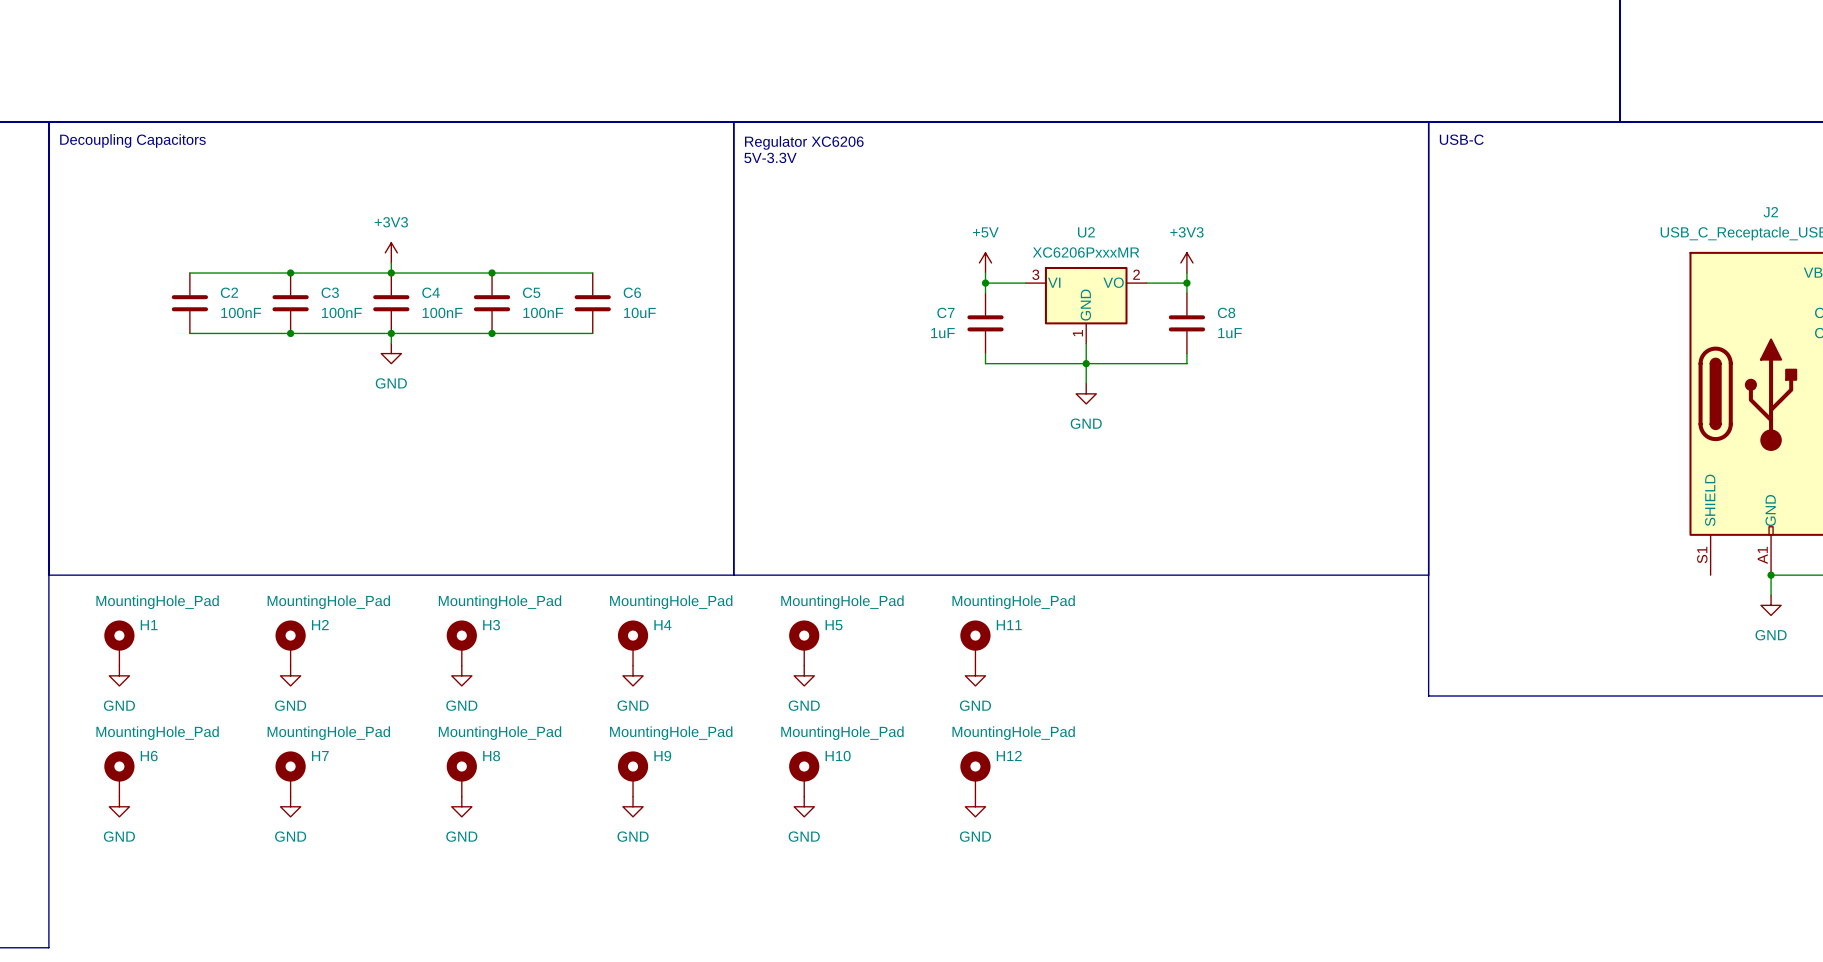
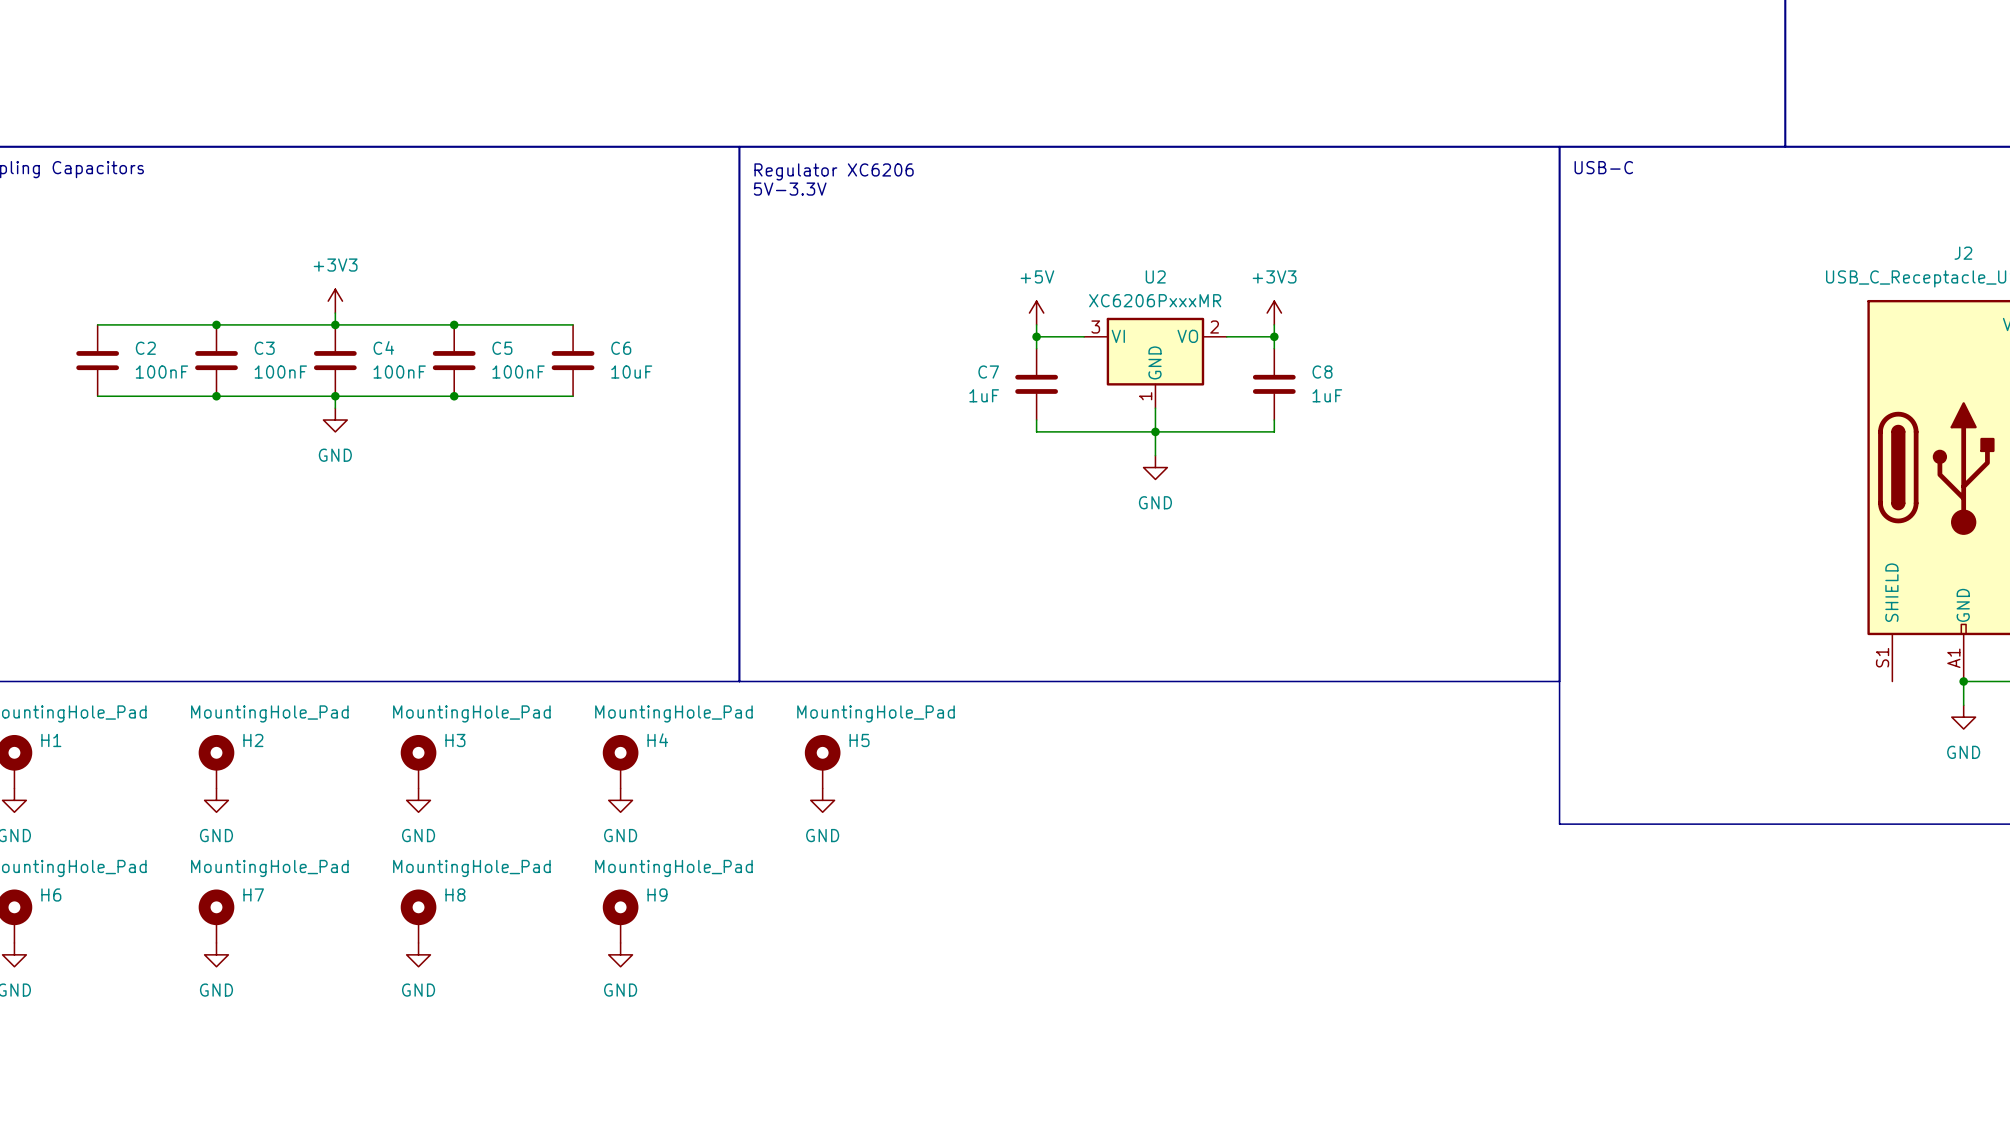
H11: MountingHole_Pad (975, 643) -> none
power symbol: GND (975, 675) -> none
H10: MountingHole_Pad (804, 774) -> none
H12: MountingHole_Pad (975, 774) -> none
power symbol: GND (804, 806) -> none
power symbol: GND (975, 806) -> none

